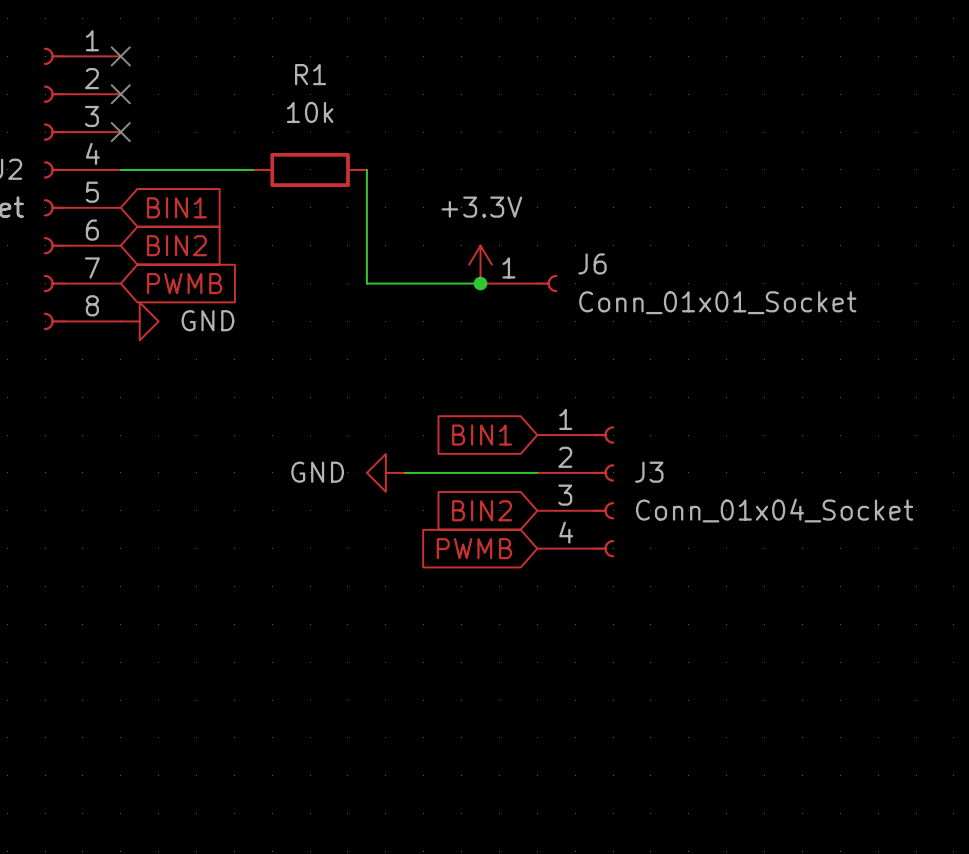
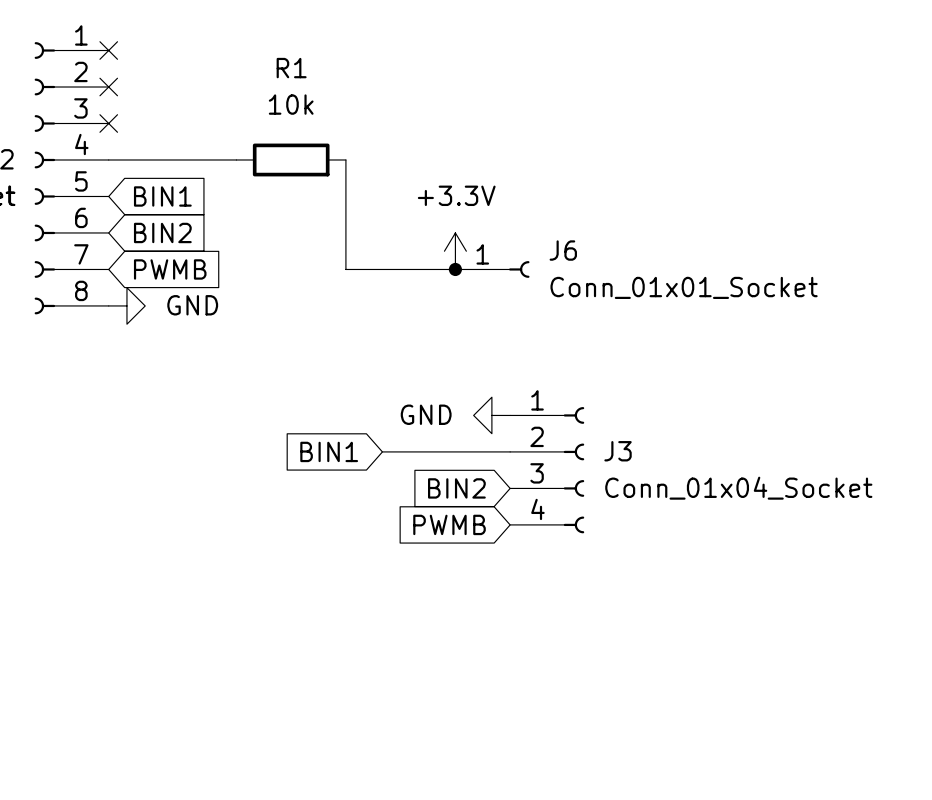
global label position: BIN1 (482, 435) -> BIN1 (329, 451)
power symbol position: GND (385, 472) -> GND (491, 415)

